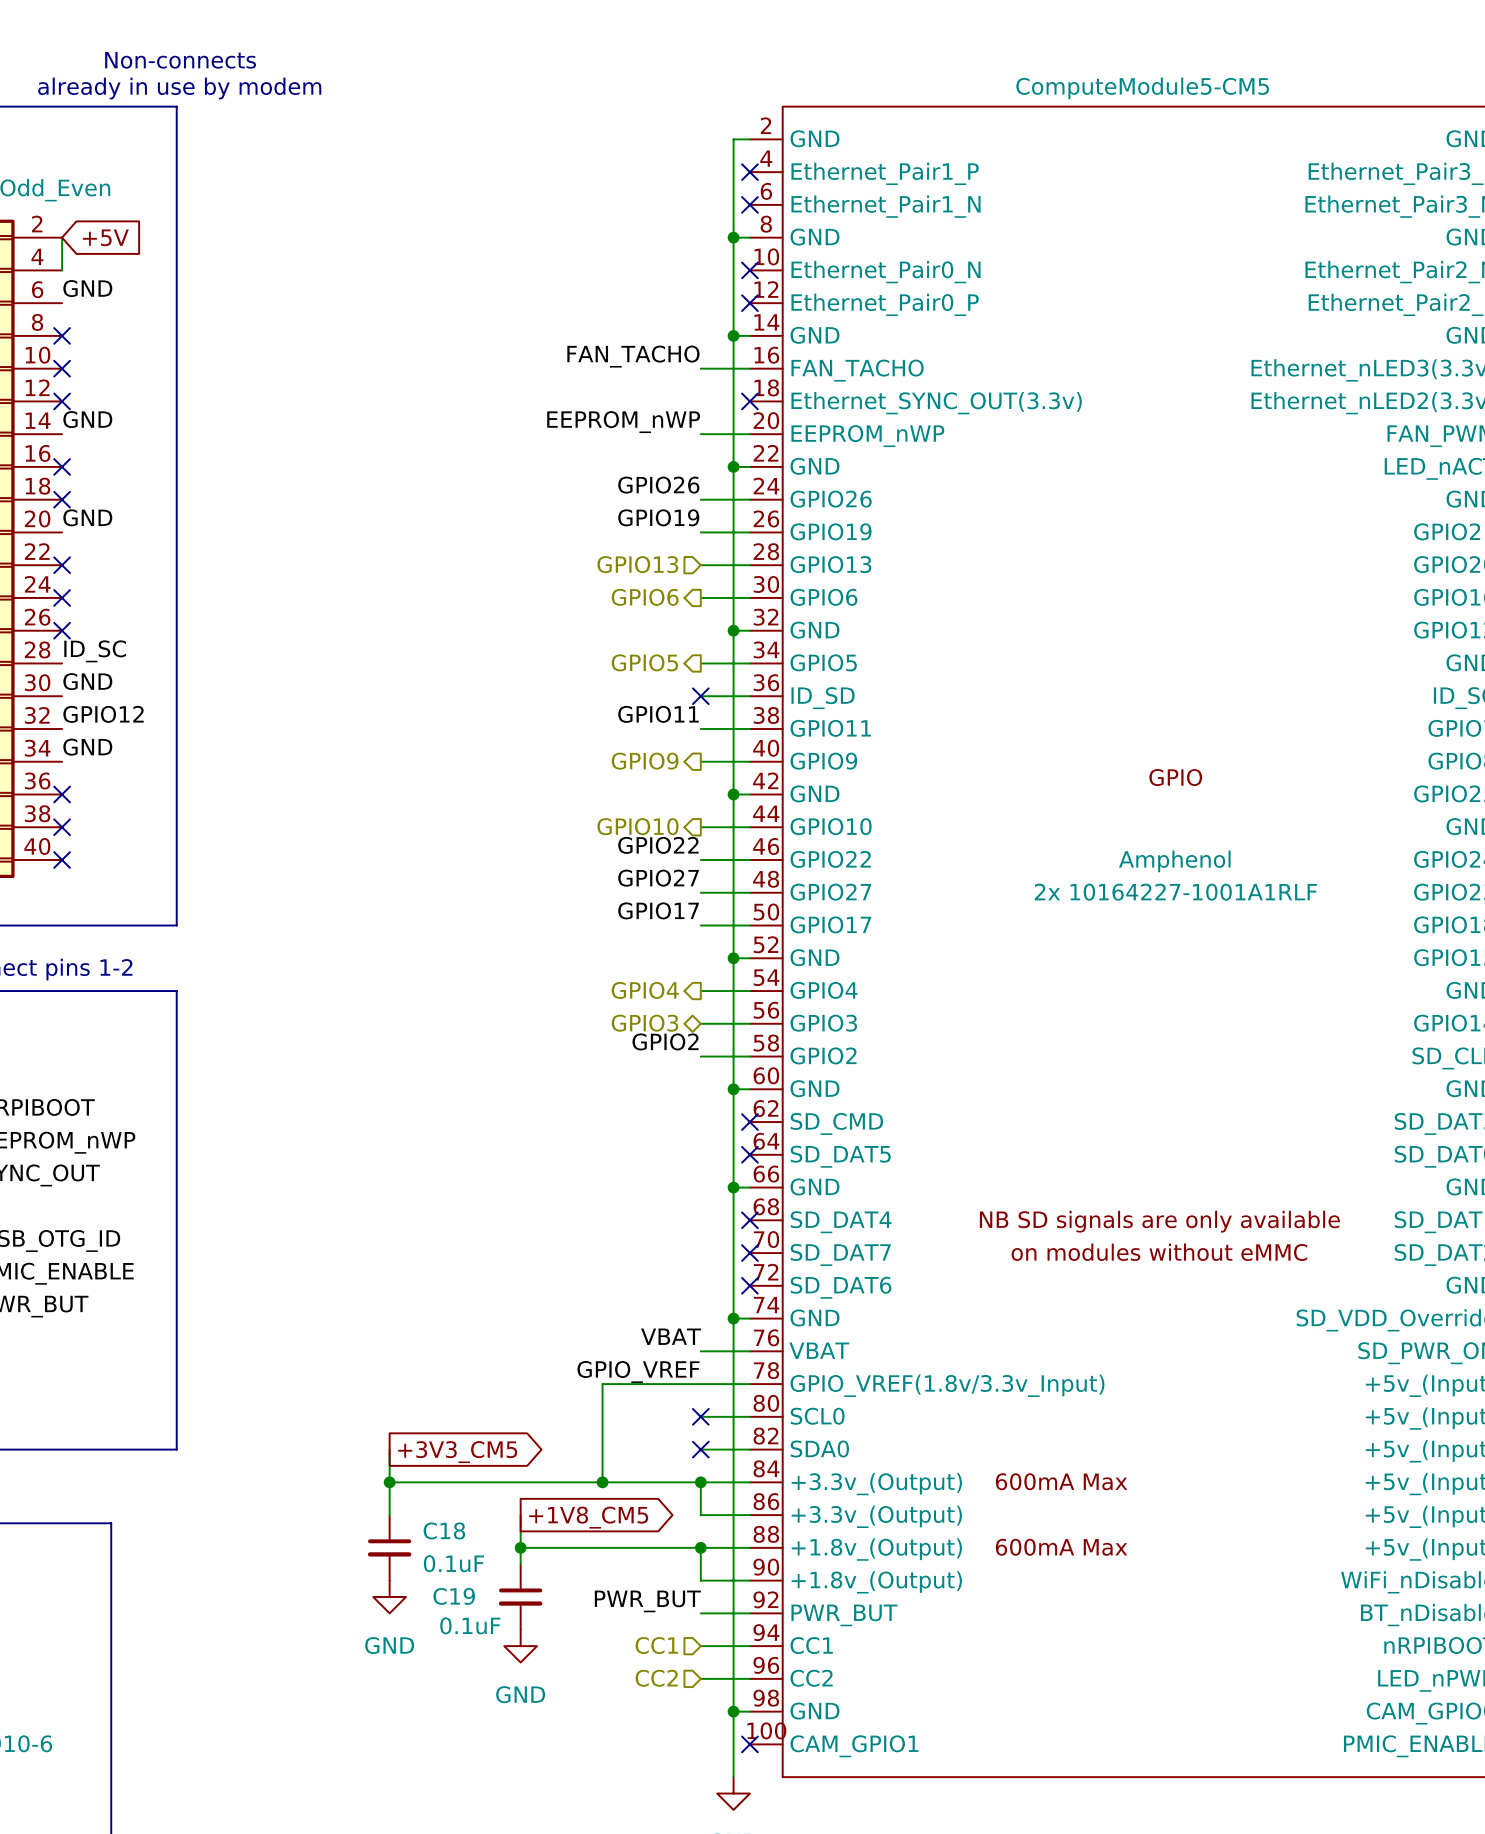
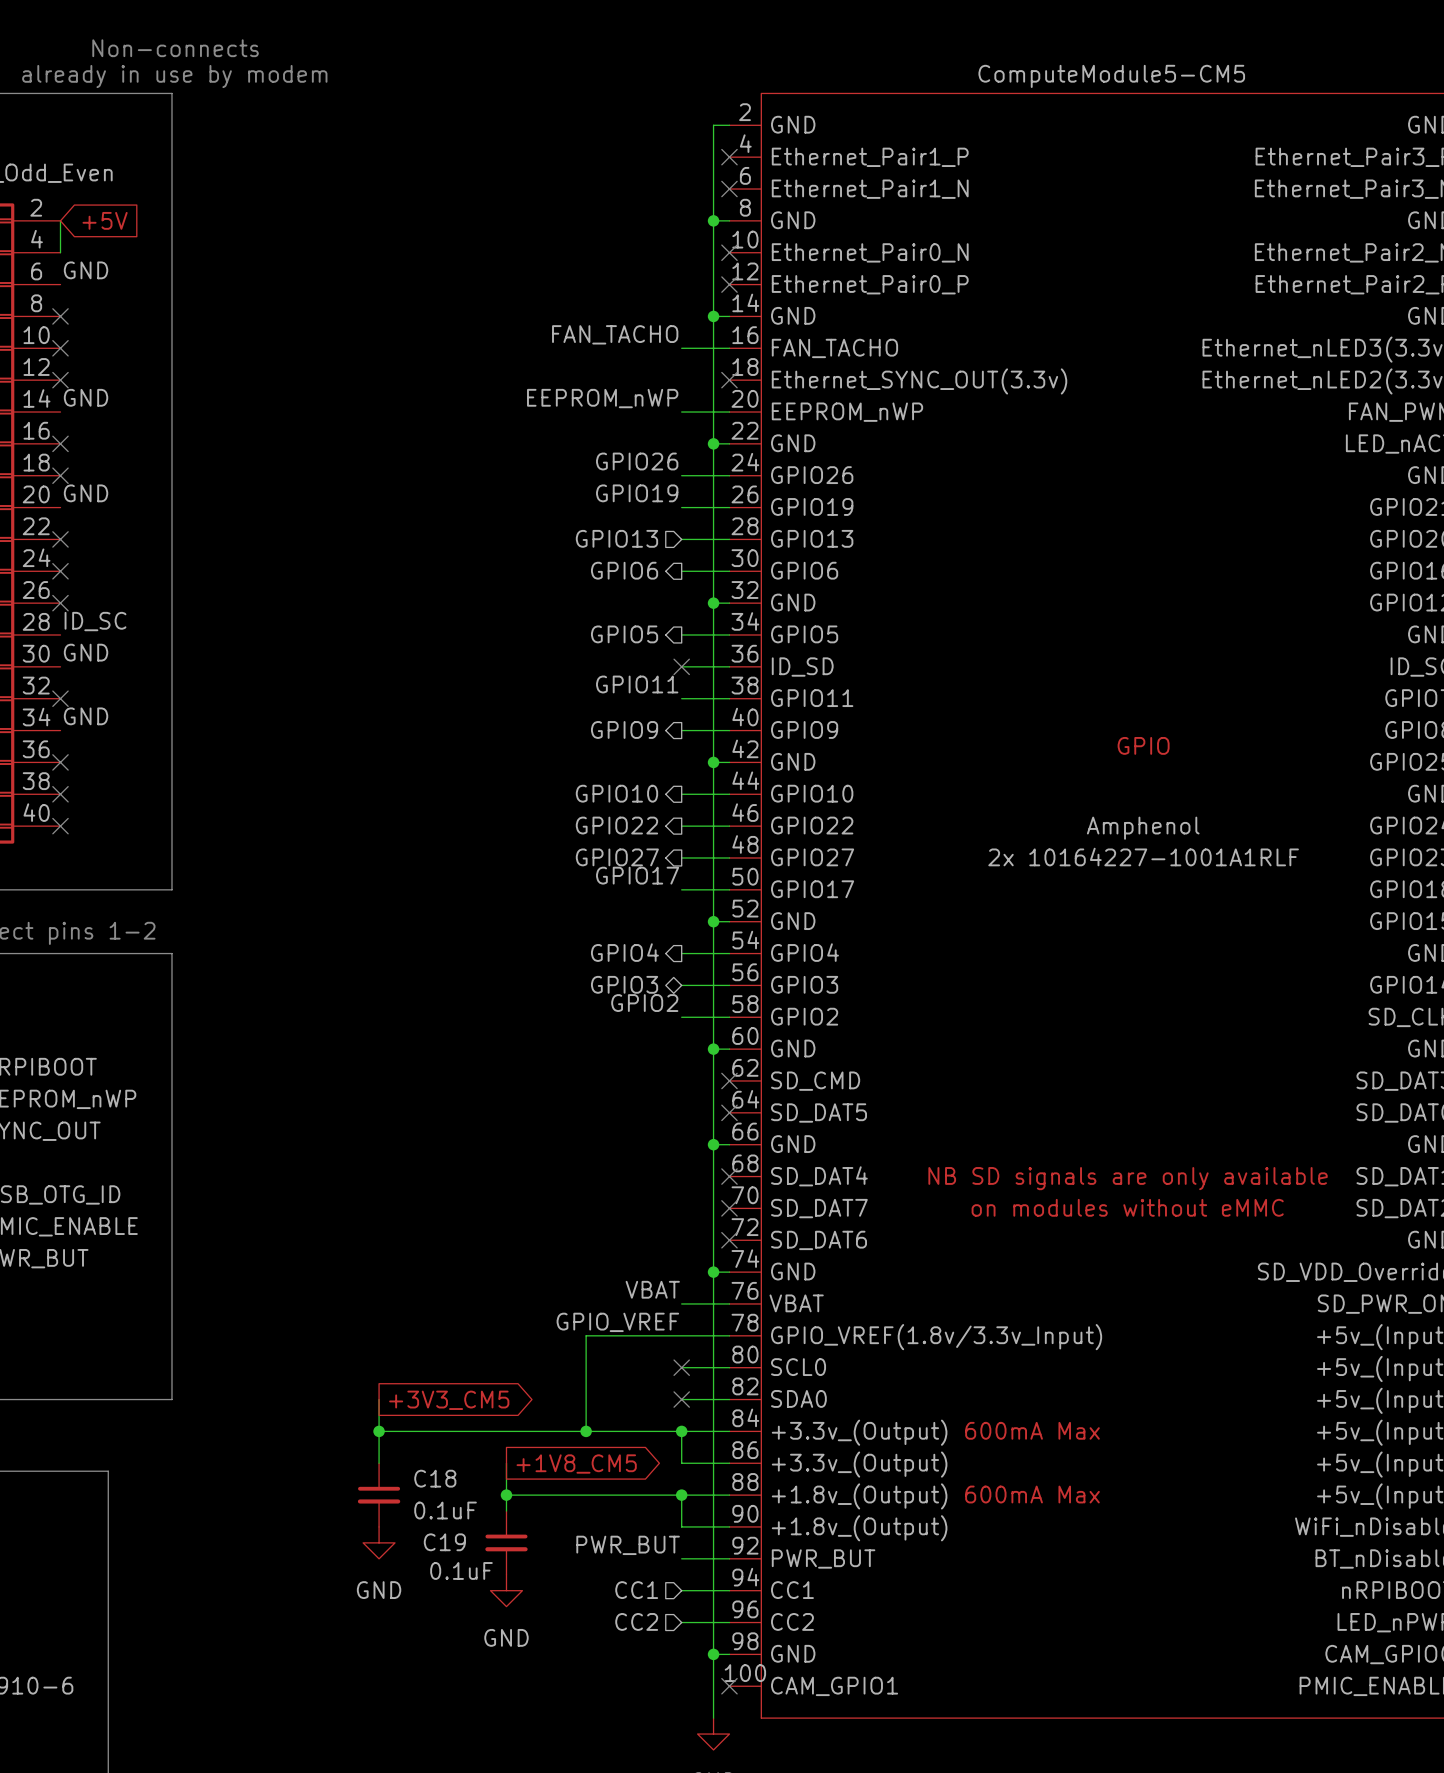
label: GPIO12 (103, 714) -> none
no-connect mark: none -> (60, 698)
label: GPIO22 (658, 845) -> none
hierarchical label: none -> GPIO22 (616, 825)
label: GPIO27 (658, 878) -> none
hierarchical label: none -> GPIO27 (617, 857)

